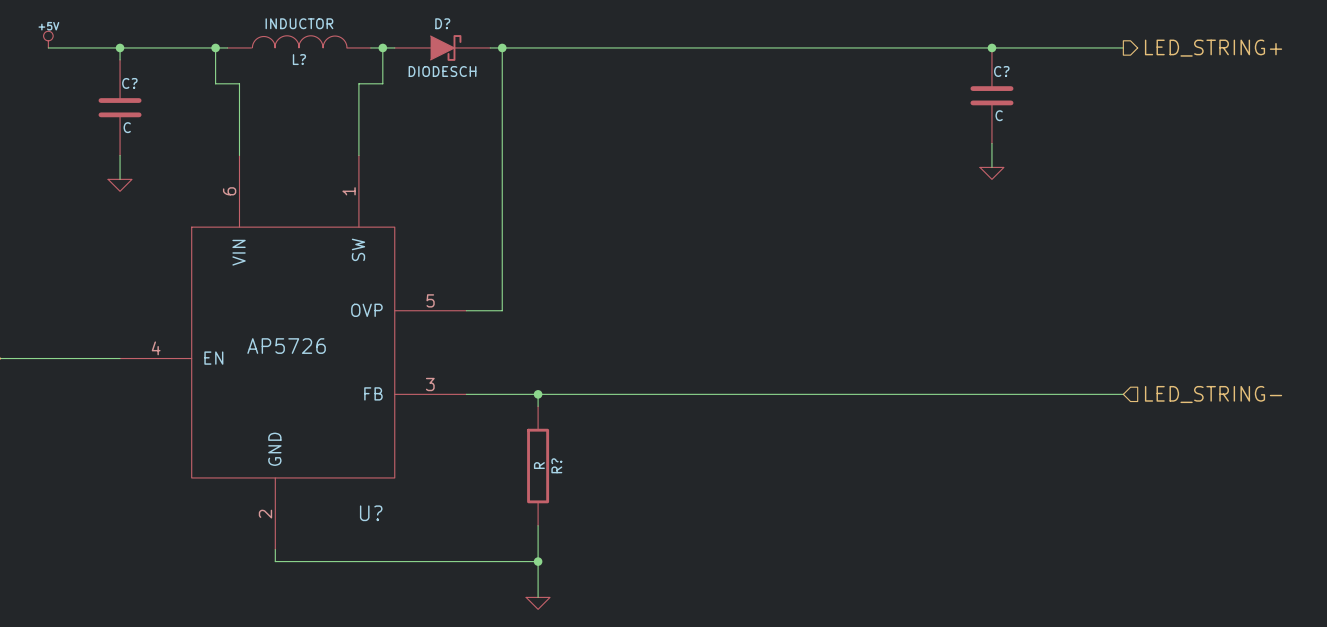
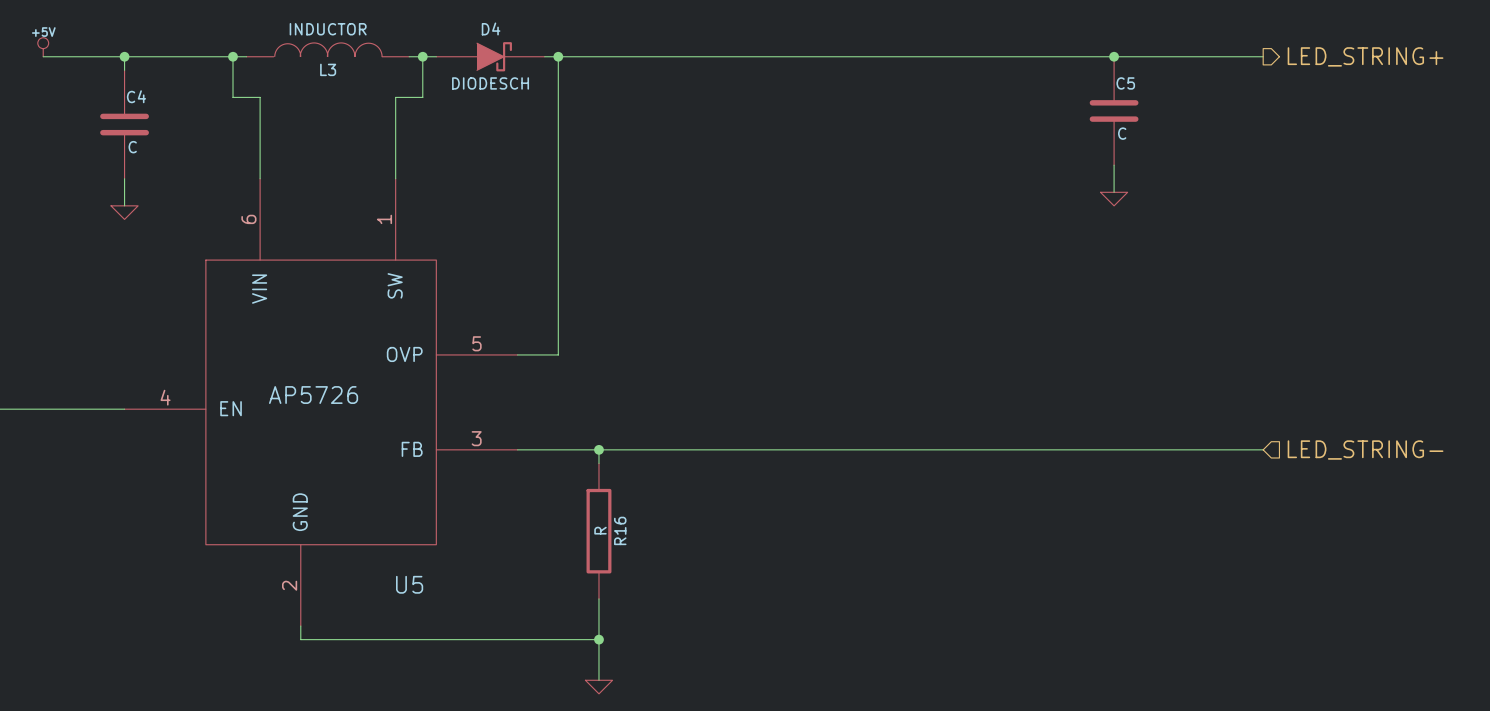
D? name: D? (442, 23) -> D4 (491, 28)
L? name: L? (299, 59) -> L3 (328, 69)
C? name: C? (1001, 71) -> C5 (1125, 83)
C? name: C? (129, 83) -> C4 (136, 96)
R? name: R? (556, 465) -> R16 (620, 530)
U? name: U? (371, 513) -> U5 (409, 584)

